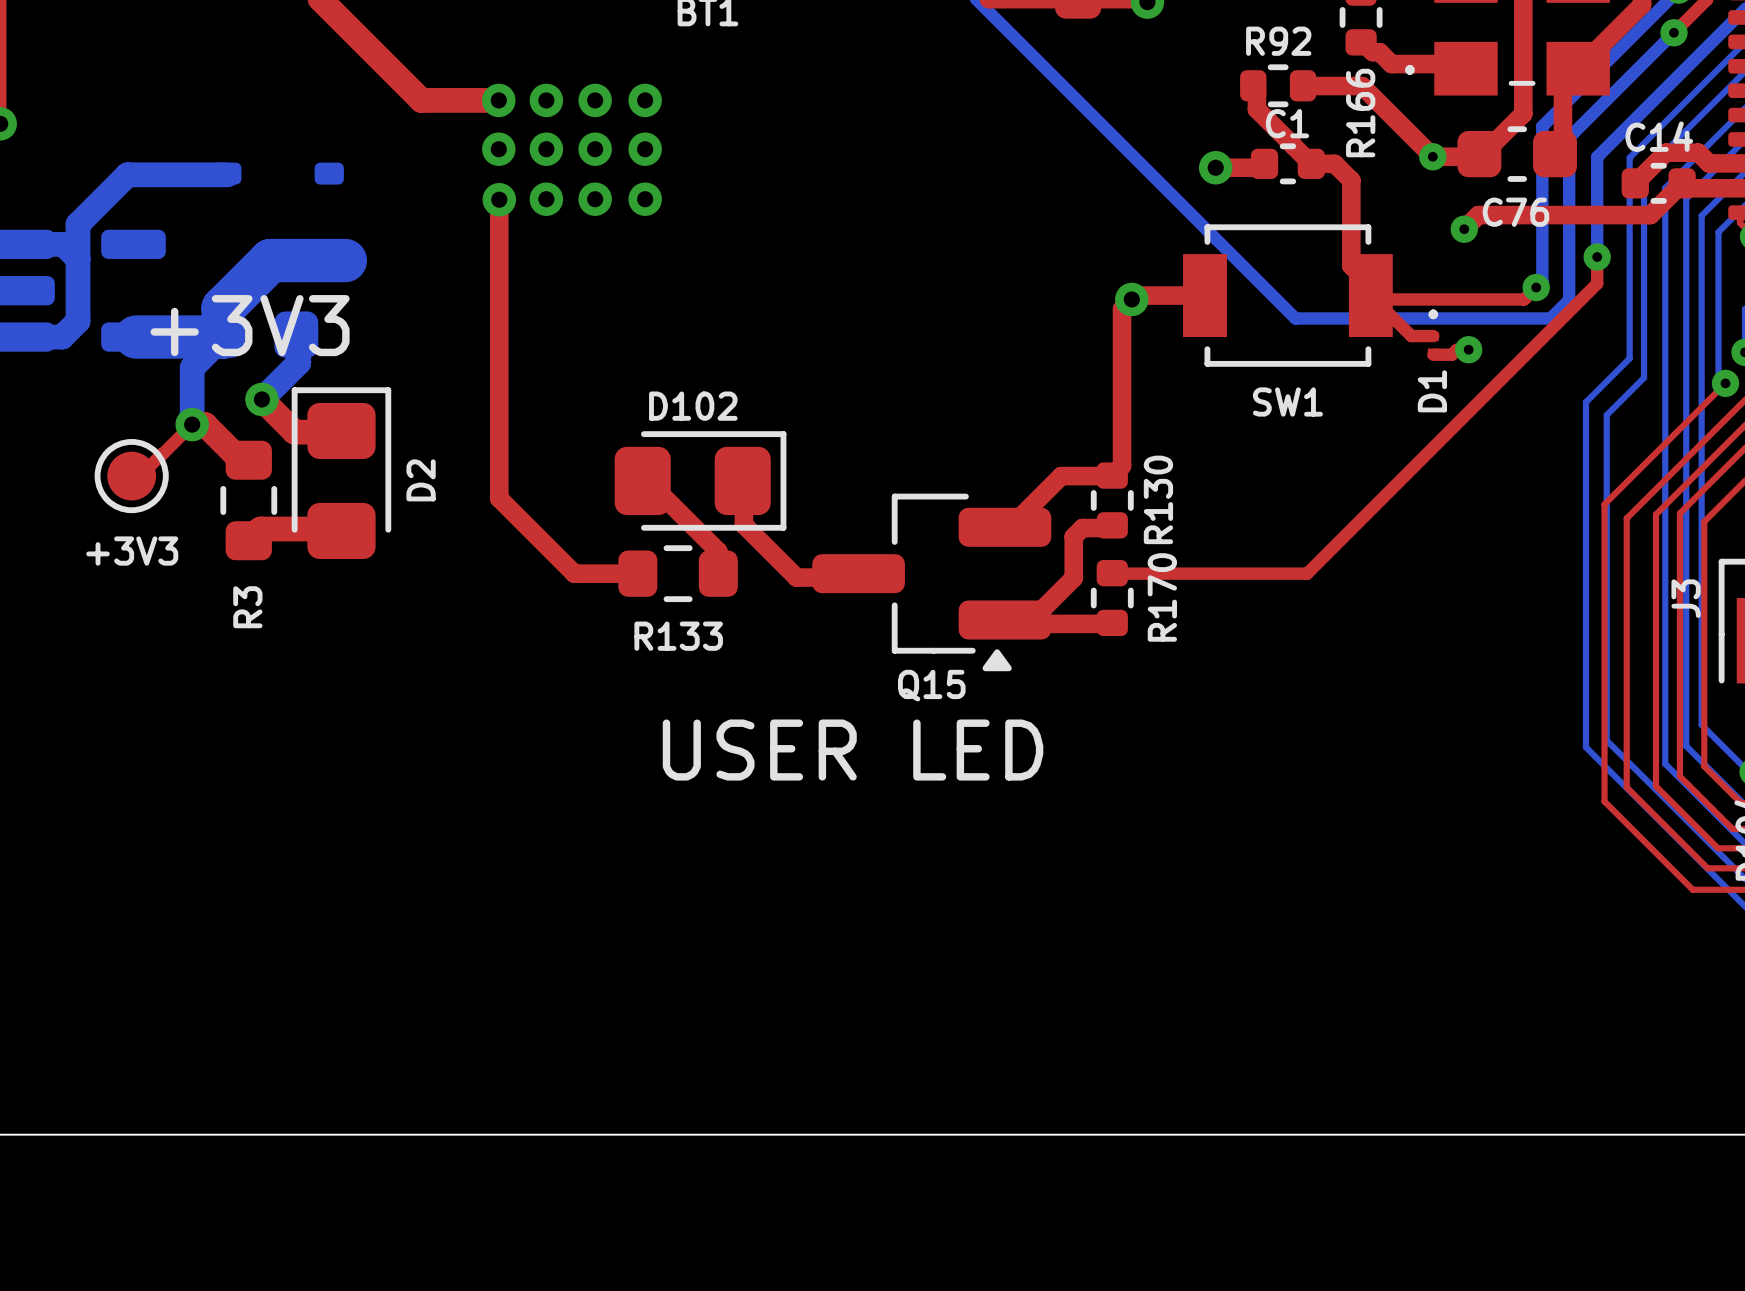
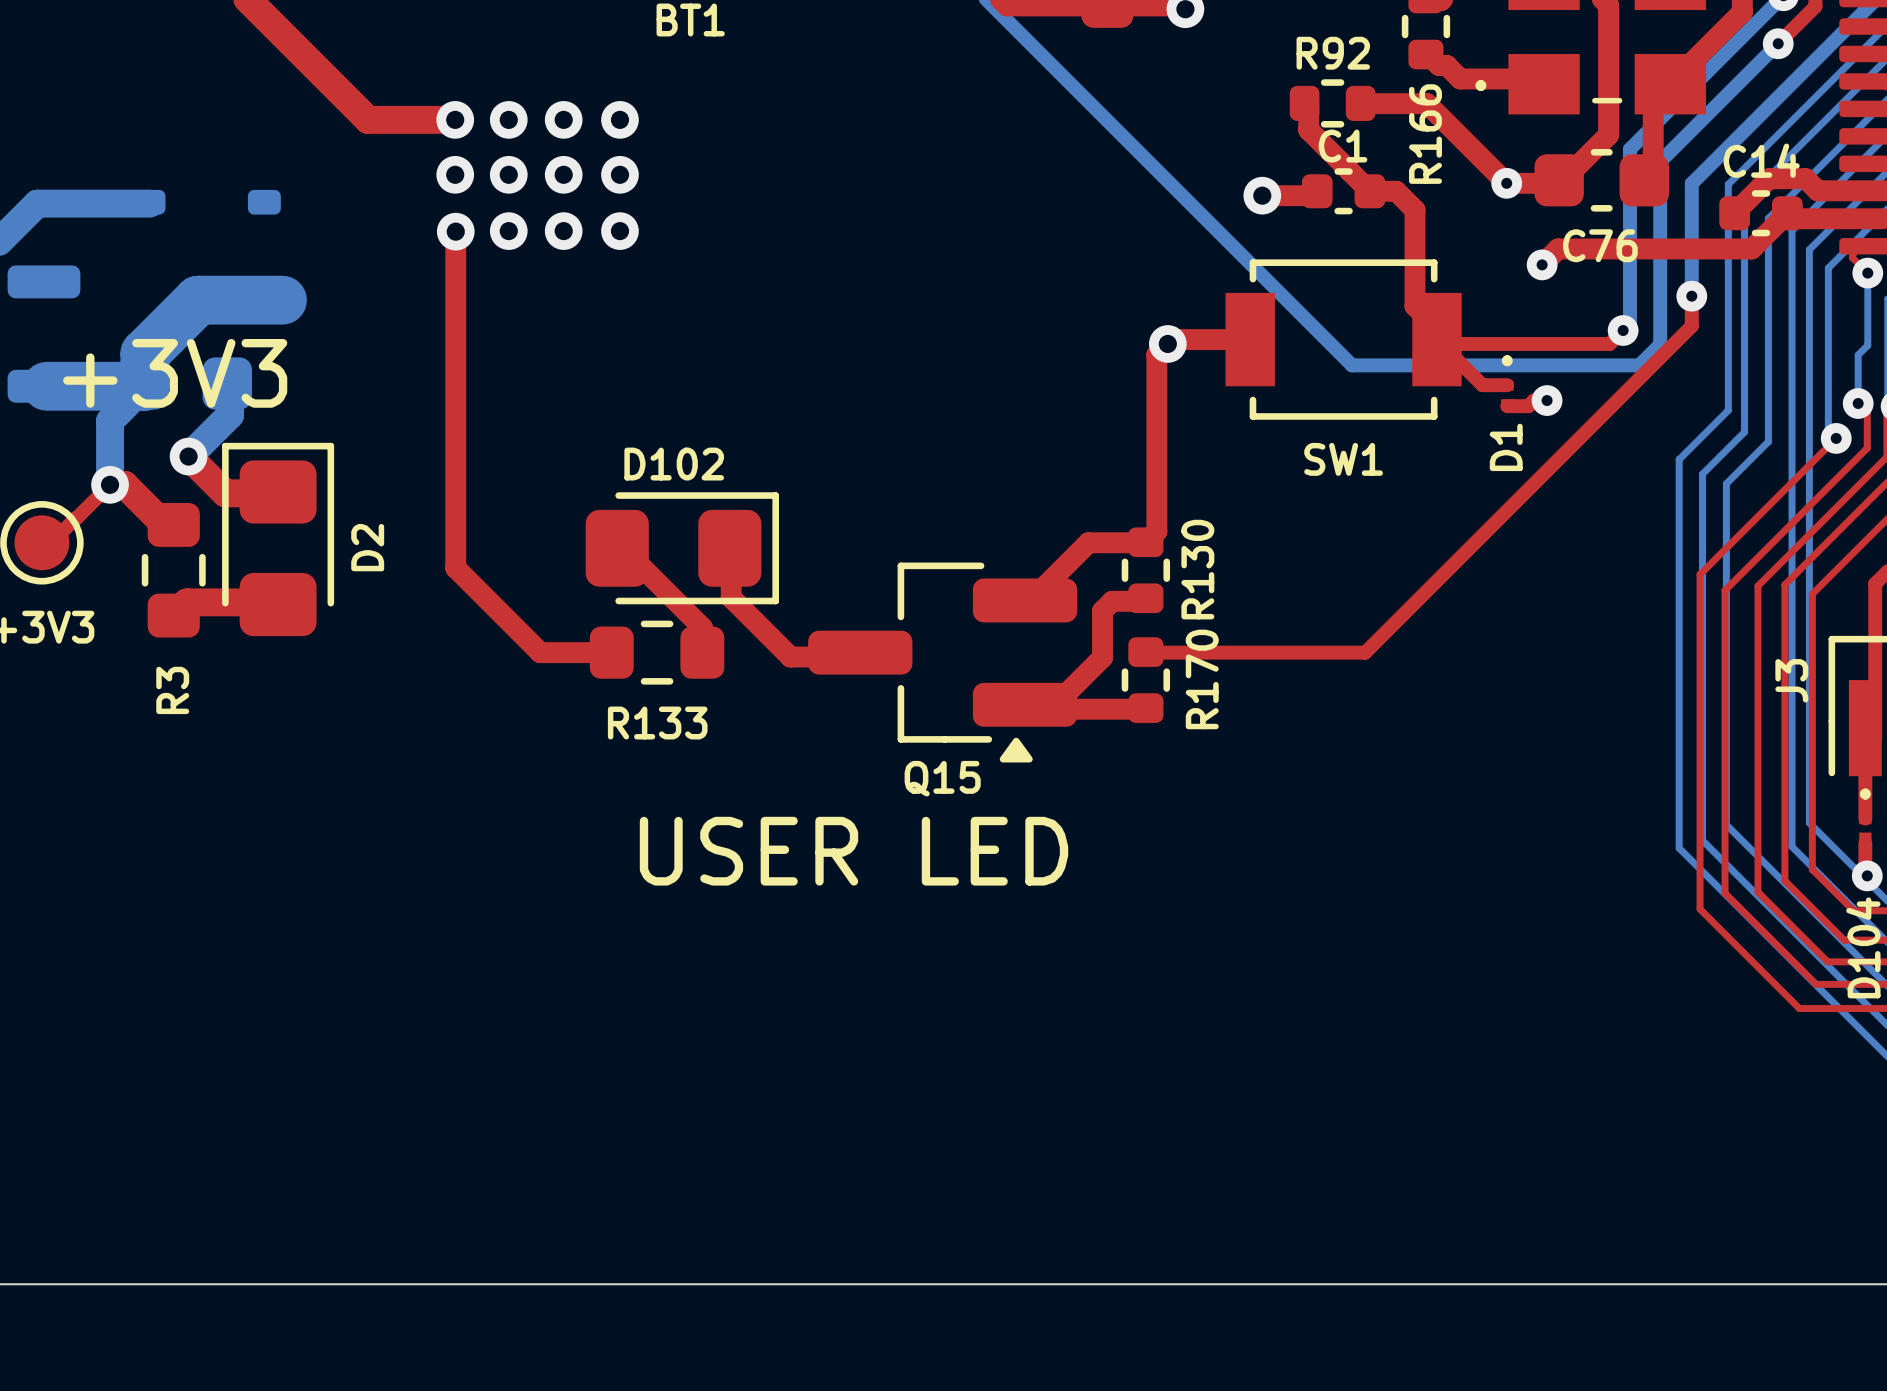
bottom track: (1665, 386) (1665, 763) -> (1768, 441) (1726, 483) (1726, 824) (1768, 866)

